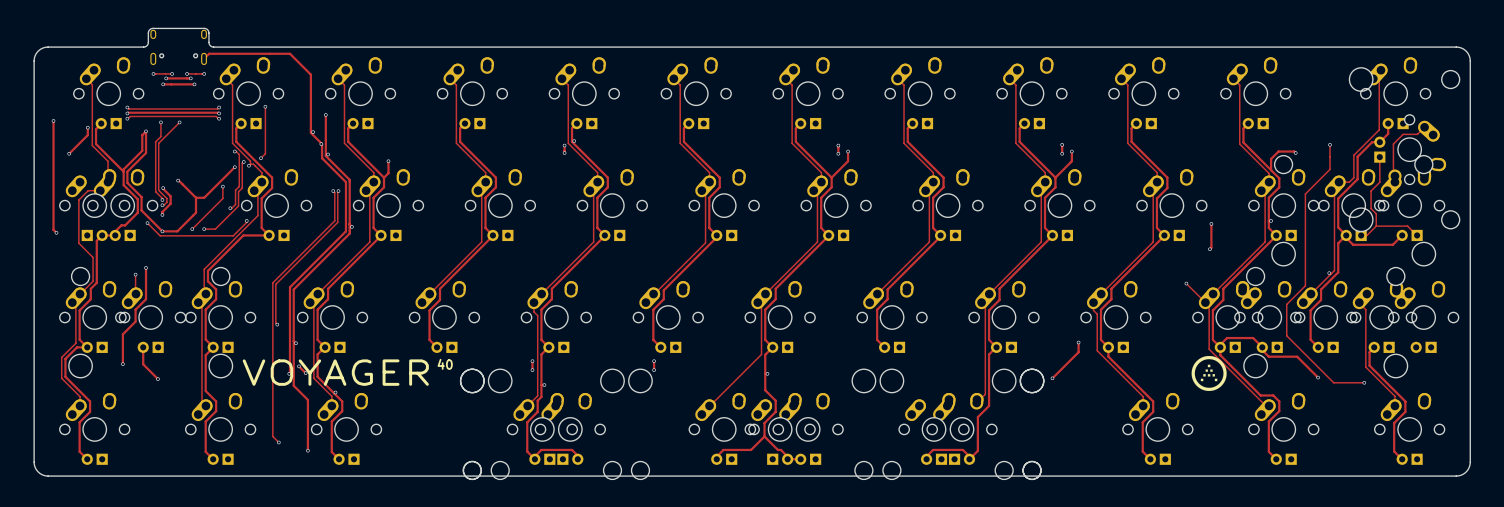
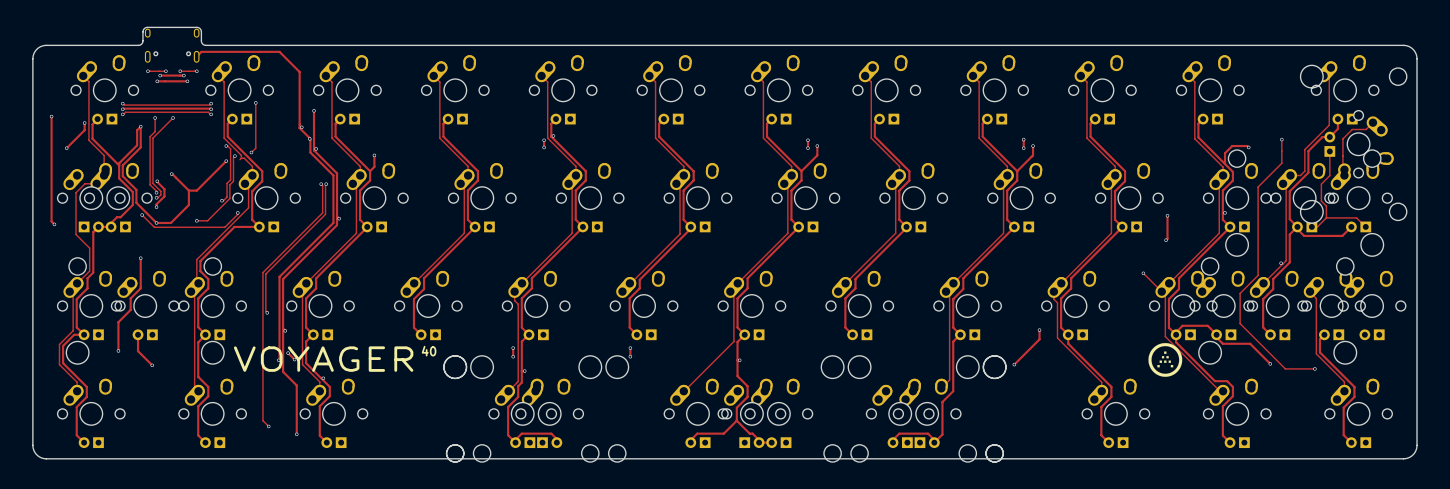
via: (248, 165) -> none
track: (222, 186) (222, 198) (192, 229) -> none
via: (222, 186) -> none
via: (192, 229) -> none
track: (135, 274) (136, 294) -> none
via: (135, 274) -> none

